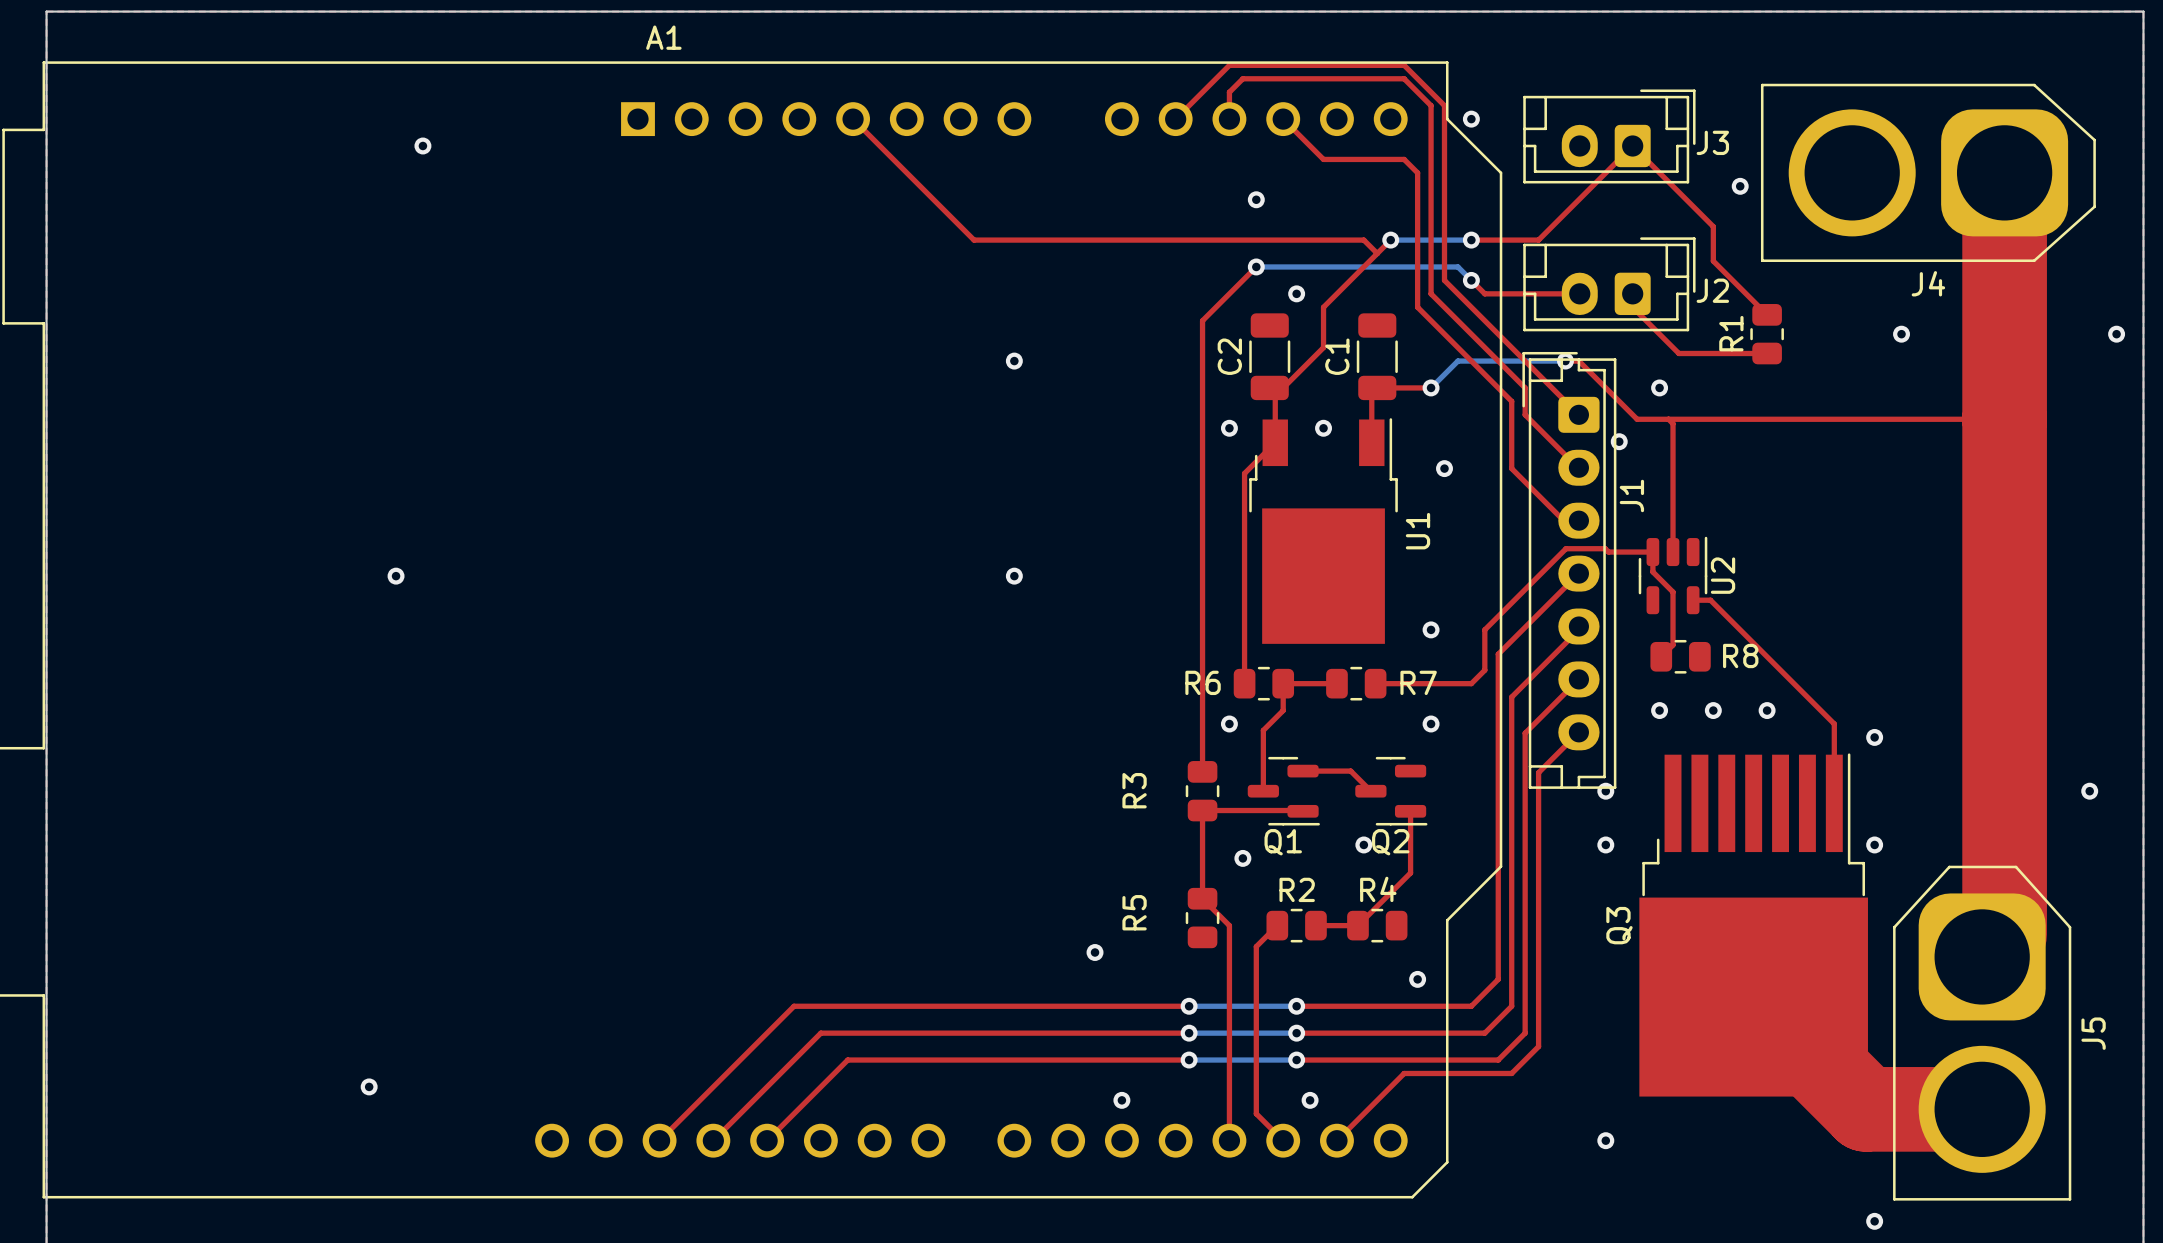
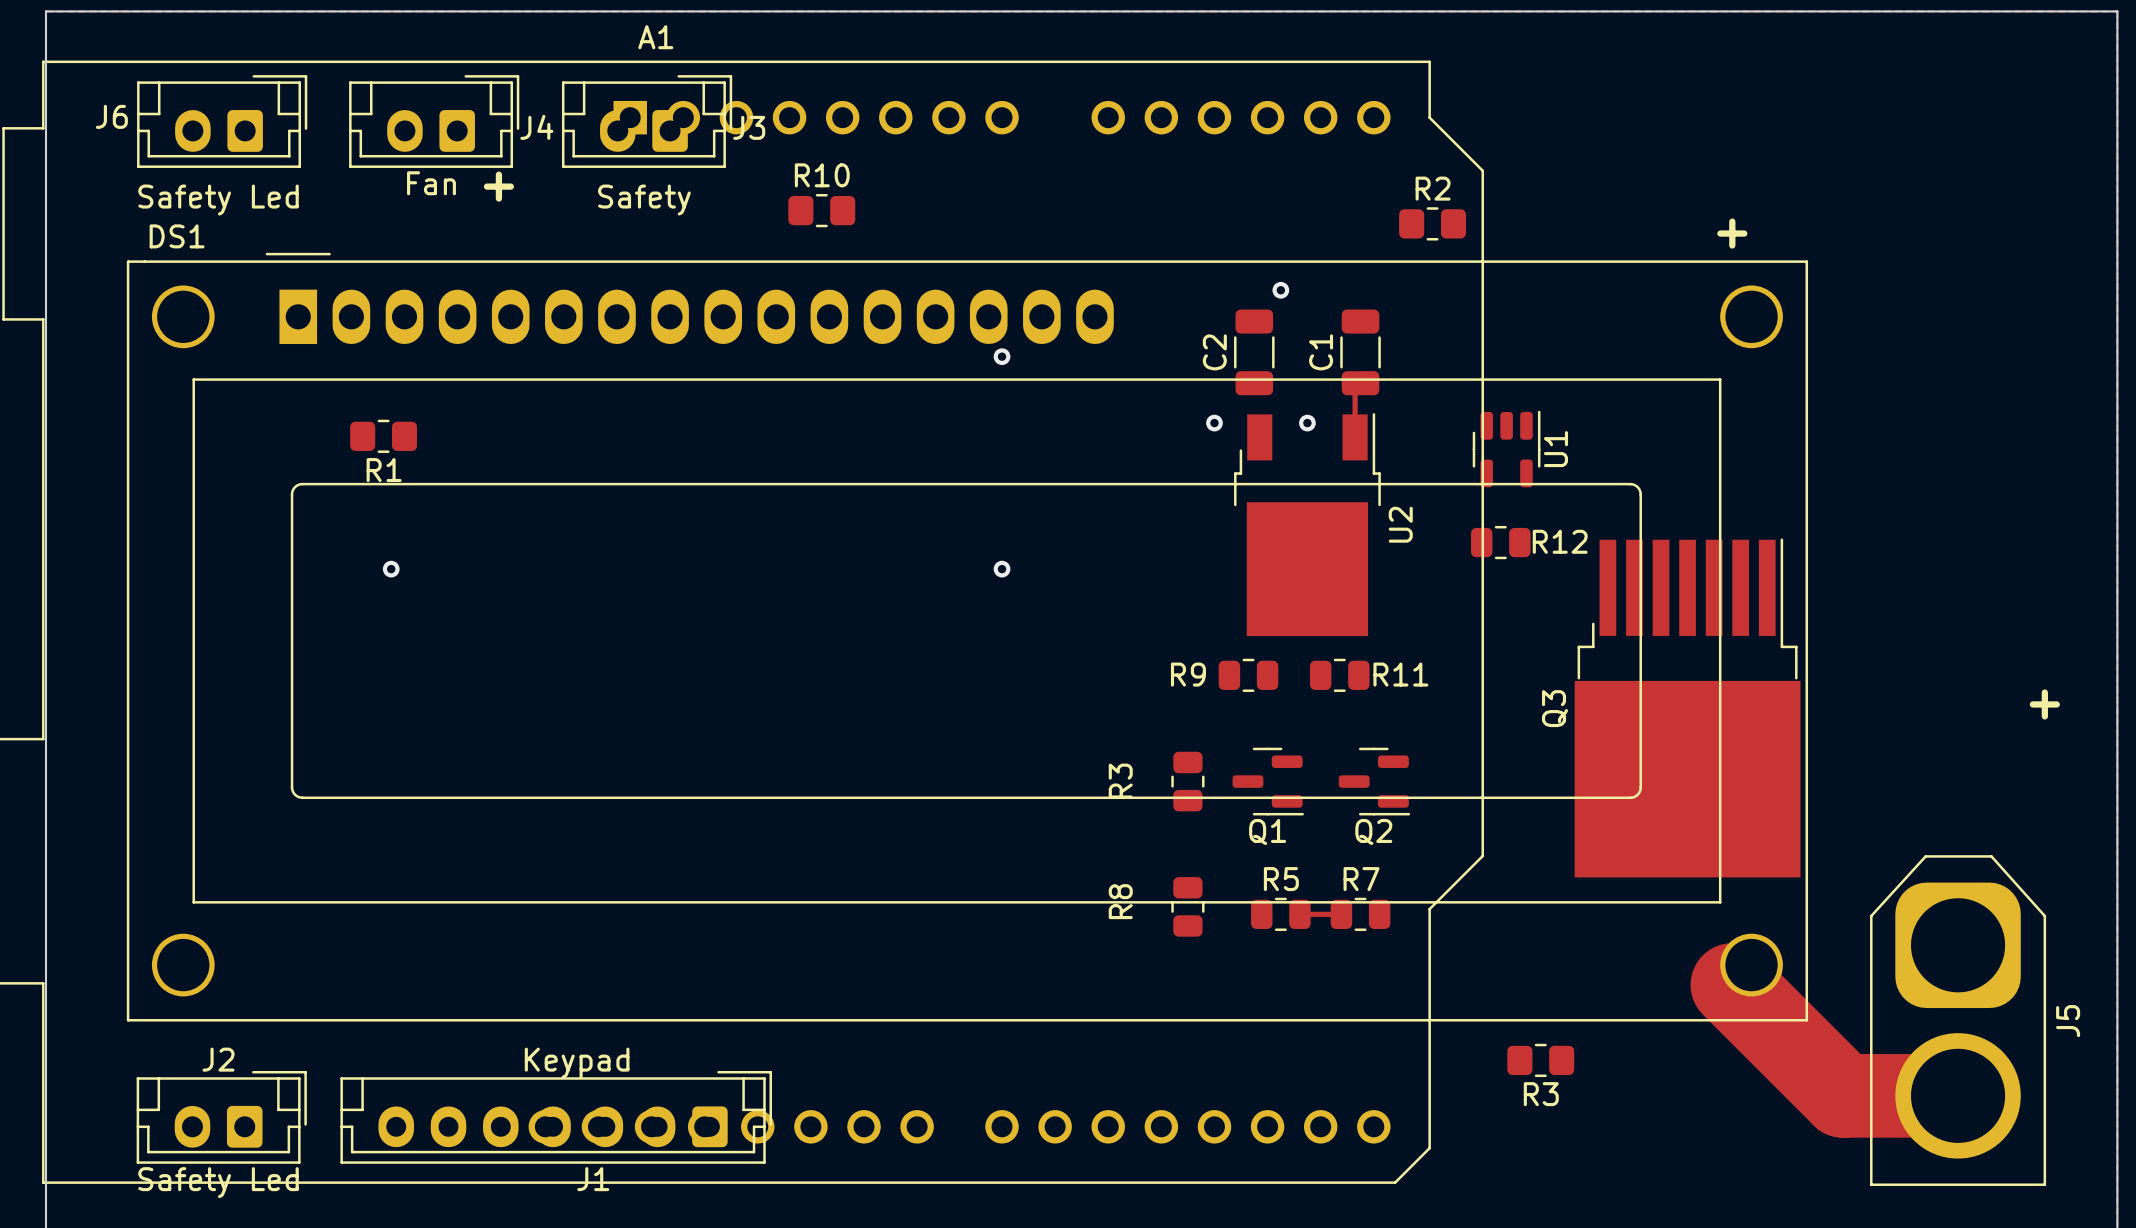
J4 footprint: [1760, 83, 2096, 262] -> [349, 75, 520, 168]
top track: (853, 119) (974, 240) (1363, 240) (1377, 253) -> none
top track: (1175, 119) (1229, 65) (1404, 65) (1444, 105) (1444, 280) (1578, 414) -> none
top track: (1229, 119) (1229, 92) (1242, 78) (1404, 78) (1431, 105) (1431, 293) (1525, 387) (1525, 414) (1578, 467) -> none
top track: (1283, 119) (1323, 159) (1404, 159) (1417, 172) (1417, 307) (1511, 401) (1511, 468) (1563, 520) (1578, 520) -> none
via: (1471, 119) -> none
J6: none -> Safety Led (222, 121)
J3 position: (1609, 136) -> (647, 121)
via: (422, 145) -> none
top track: (2004, 172) (2004, 934) -> none
J4 value: none -> Fan (431, 183)
via: (1740, 186) -> none
text: none -> + (498, 186)
via: (1256, 199) -> none
J3 value: none -> Safety (644, 200)
R10: none -> (821, 210)
R2: none -> (1432, 223)
text: none -> + (1732, 233)
top track: (1390, 240) (1323, 307) (1323, 347) (1283, 387) -> none
bottom track: (1390, 240) (1471, 240) -> none
via: (1390, 240) -> none
top track: (1471, 240) (1538, 240) (1632, 145) (1713, 226) (1713, 261) (1767, 314) -> none
via: (1471, 240) -> none
top track: (1256, 266) (1202, 320) (1202, 771) -> none
bottom track: (1256, 266) (1457, 266) (1471, 280) -> none
via: (1256, 266) -> none
top track: (1471, 280) (1484, 293) (1579, 293) -> none
via: (1471, 280) -> none
J4 name position: J4 (1928, 283) -> J4 (536, 127)
J2 position: (1609, 284) -> (221, 1117)
J2 name position: J2 (1712, 290) -> J2 (218, 1059)
top track: (1632, 293) (1632, 307) (1678, 353) (1767, 353) -> none
R1 footprint: [1750, 304, 1784, 365] -> [350, 419, 418, 453]
R1 name position: R1 (1731, 333) -> R1 (384, 470)
via: (1901, 334) -> none
via: (2116, 334) -> none
top track: (1565, 361) (1578, 361) (1637, 419) (2004, 419) -> none
bottom track: (1565, 361) (1457, 361) (1431, 387) -> none
via: (1565, 361) -> none
top track: (1377, 387) (1431, 387) -> none
via: (1431, 387) -> none
via: (1659, 387) -> none
top track: (1275, 393) (1275, 442) (1244, 473) (1244, 683) -> none
top track: (1668, 419) (1673, 423) (1673, 552) -> none
via: (1619, 441) -> none
U1: none -> (1506, 448)
via: (1444, 468) -> none
U1 name: U1 (1417, 531) -> U2 (1400, 524)
R12: none -> (1500, 542)
J1 rotation: 0° (1569, 570) -> 90° clockwise (556, 1117)
J1 position: (1569, 570) -> (556, 1117)
top track: (1578, 573) (1498, 654) (1498, 979) (1471, 1006) (1296, 1006) -> none
U2: (1673, 575) -> none
top track: (1693, 600) (1710, 600) (1834, 723) (1834, 803) -> none
top track: (1578, 626) (1578, 629) (1511, 697) (1511, 1006) (1484, 1033) (1296, 1033) -> none
via: (1431, 629) -> none
DS1: none -> (967, 637)
top track: (1661, 656) (1673, 645) (1673, 592) (1652, 571) (1652, 552) (1608, 552) (1605, 548) (1565, 548) (1484, 629) (1484, 670) (1471, 683) (1375, 683) -> none
R8: (1680, 656) -> none
top track: (1578, 679) (1525, 733) (1525, 1033) (1498, 1060) (1296, 1060) -> none
R6 name: R6 (1203, 682) -> R9 (1188, 674)
R7 name: R7 (1418, 682) -> R11 (1400, 674)
top track: (1336, 683) (1283, 683) (1283, 710) (1263, 730) (1263, 791) -> none
via: (1659, 710) -> none
via: (1713, 710) -> none
via: (1767, 710) -> none
text: none -> + (2044, 704)
via: (1229, 723) -> none
via: (1431, 723) -> none
top track: (1578, 732) (1538, 772) (1538, 1046) (1511, 1073) (1404, 1073) (1336, 1140) -> none
via: (1874, 737) -> none
top track: (1303, 771) (1350, 771) (1370, 791) -> none
via: (1605, 791) -> none
via: (2089, 791) -> none
top track: (1302, 810) (1202, 810) (1202, 898) (1229, 925) (1229, 1140) -> none
top track: (1410, 811) (1410, 873) (1357, 925) -> none
via: (1363, 844) -> none
via: (1605, 844) -> none
via: (1874, 844) -> none
via: (1242, 858) -> none
R2 name: R2 (1297, 889) -> R5 (1281, 879)
R4 name: R4 (1378, 889) -> R7 (1361, 879)
R5 name: R5 (1134, 912) -> R8 (1120, 901)
Q3 position: (1753, 924) -> (1687, 707)
top track: (1277, 925) (1256, 946) (1256, 1113) (1283, 1140) -> none
via: (1095, 952) -> none
via: (1417, 979) -> none
top track: (1189, 1006) (794, 1006) (659, 1140) -> none
bottom track: (1189, 1006) (1296, 1006) -> none
via: (1189, 1006) -> none
via: (1296, 1006) -> none
top track: (1189, 1033) (820, 1033) (713, 1140) -> none
bottom track: (1189, 1033) (1296, 1033) -> none
via: (1189, 1033) -> none
via: (1296, 1033) -> none
top track: (1189, 1060) (847, 1060) (767, 1140) -> none
bottom track: (1189, 1060) (1296, 1060) -> none
via: (1189, 1060) -> none
via: (1296, 1060) -> none
R3: none -> (1540, 1060)
J1 value: none -> Keypad (577, 1063)
via: (369, 1086) -> none
via: (1121, 1100) -> none
via: (1310, 1100) -> none
via: (1605, 1140) -> none
J2 value: none -> Safety Led (218, 1182)
via: (1874, 1221) -> none

